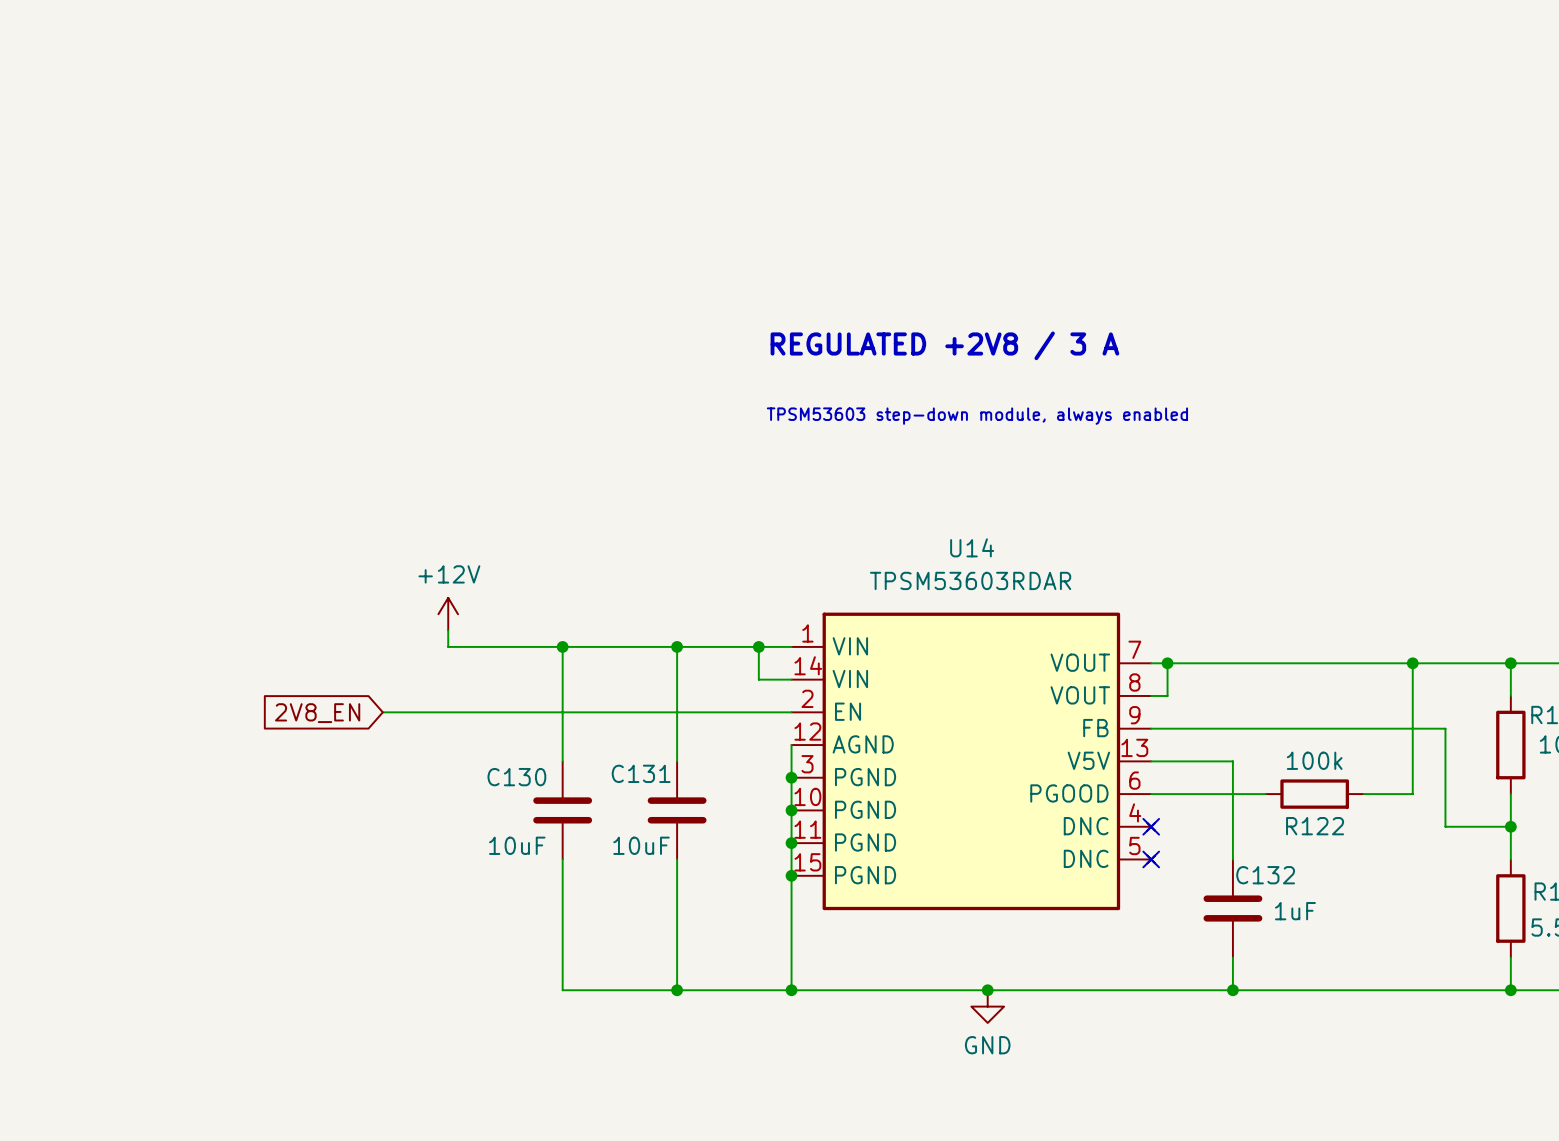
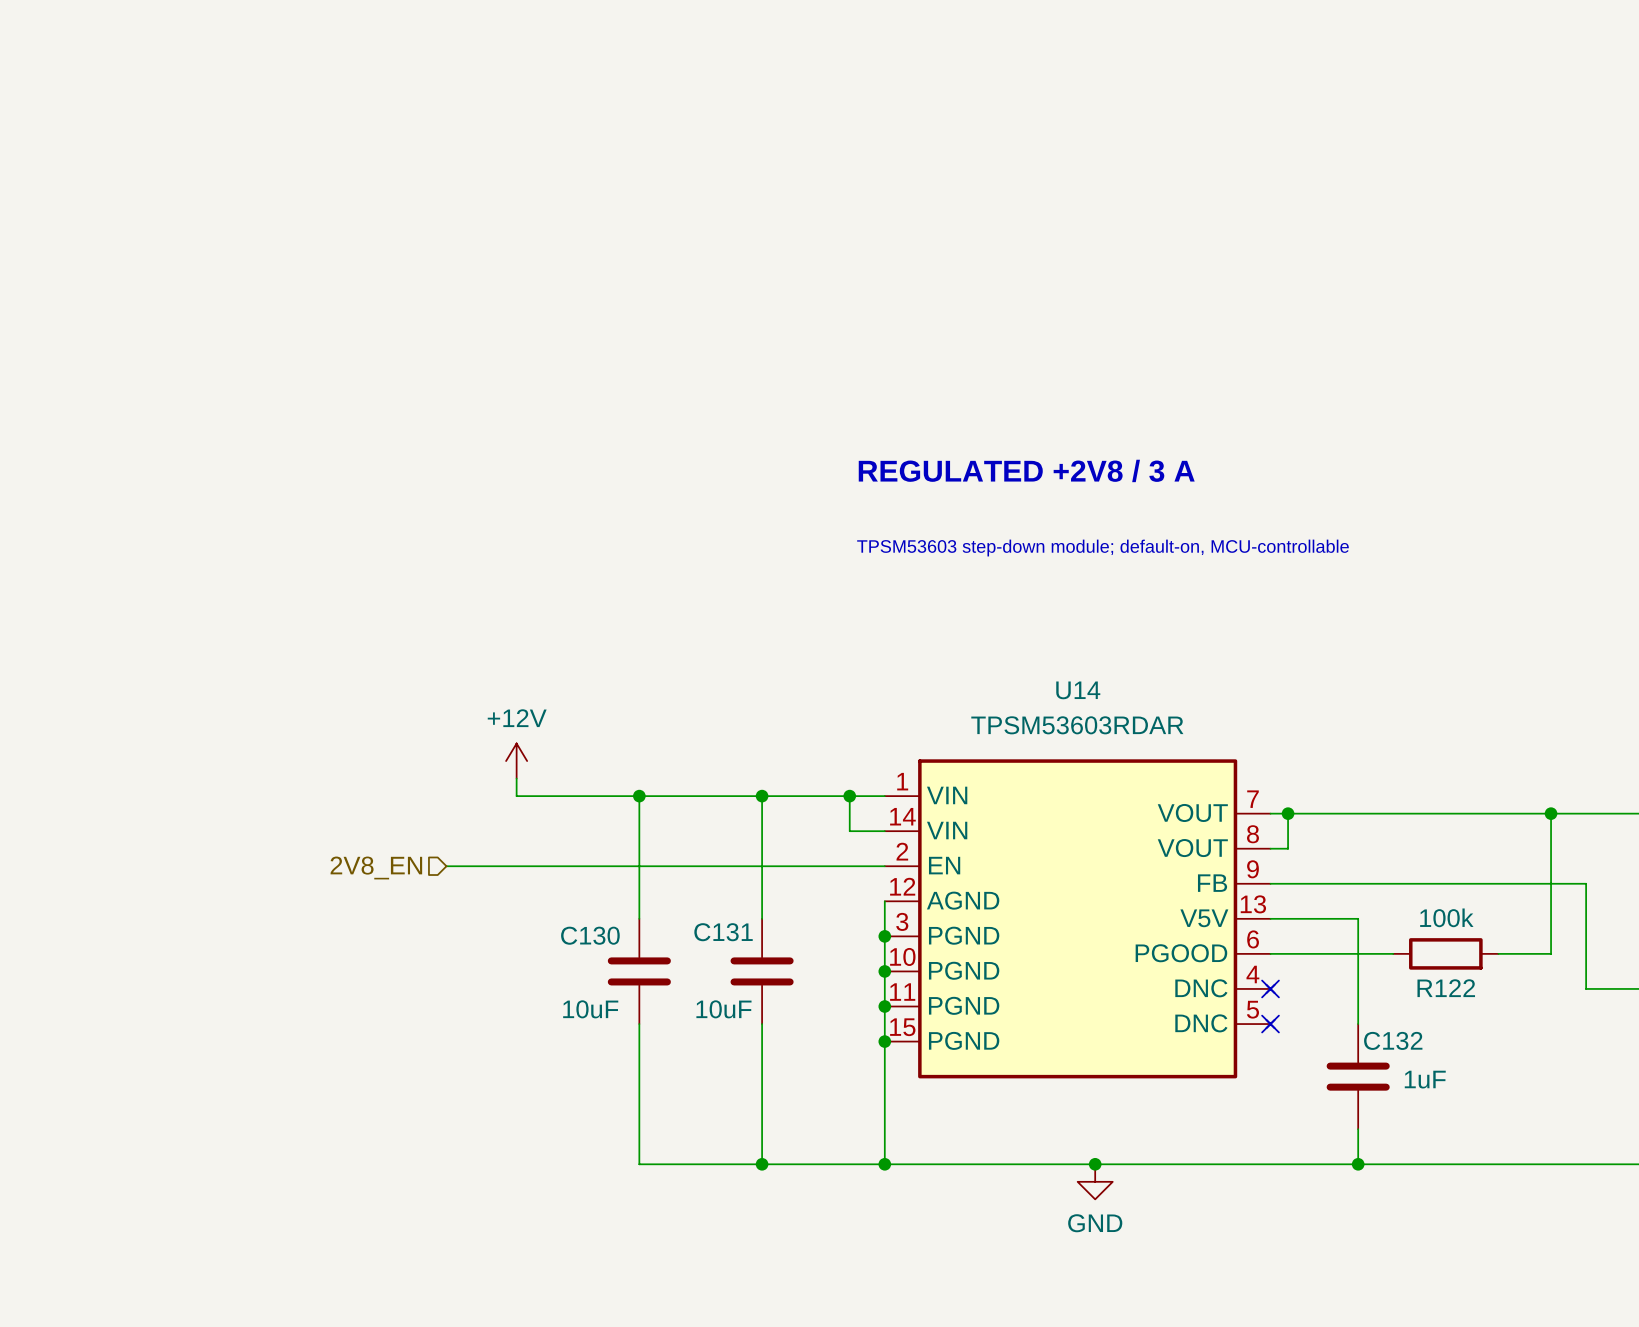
text: TPSM53603 step-down module, always enabled (977, 416) -> TPSM53603 step-down module; default-on, MCU-controllable (1102, 548)
hierarchical label: none -> 2V8_EN (376, 867)
global label: 2V8_EN (317, 713) -> none

